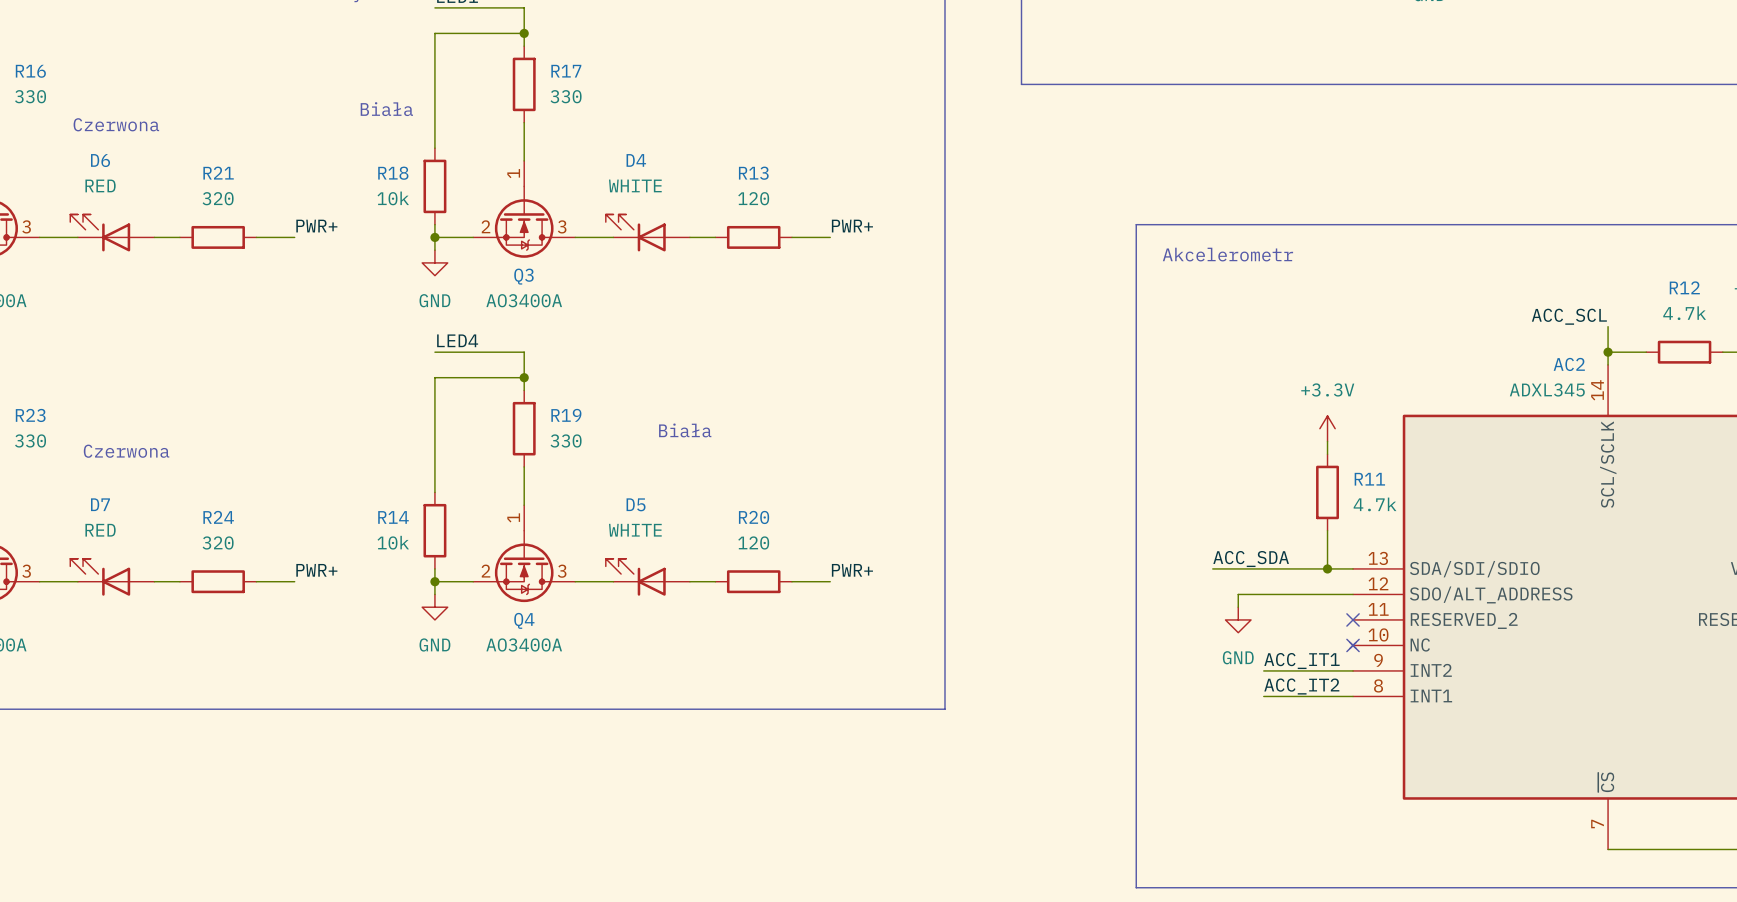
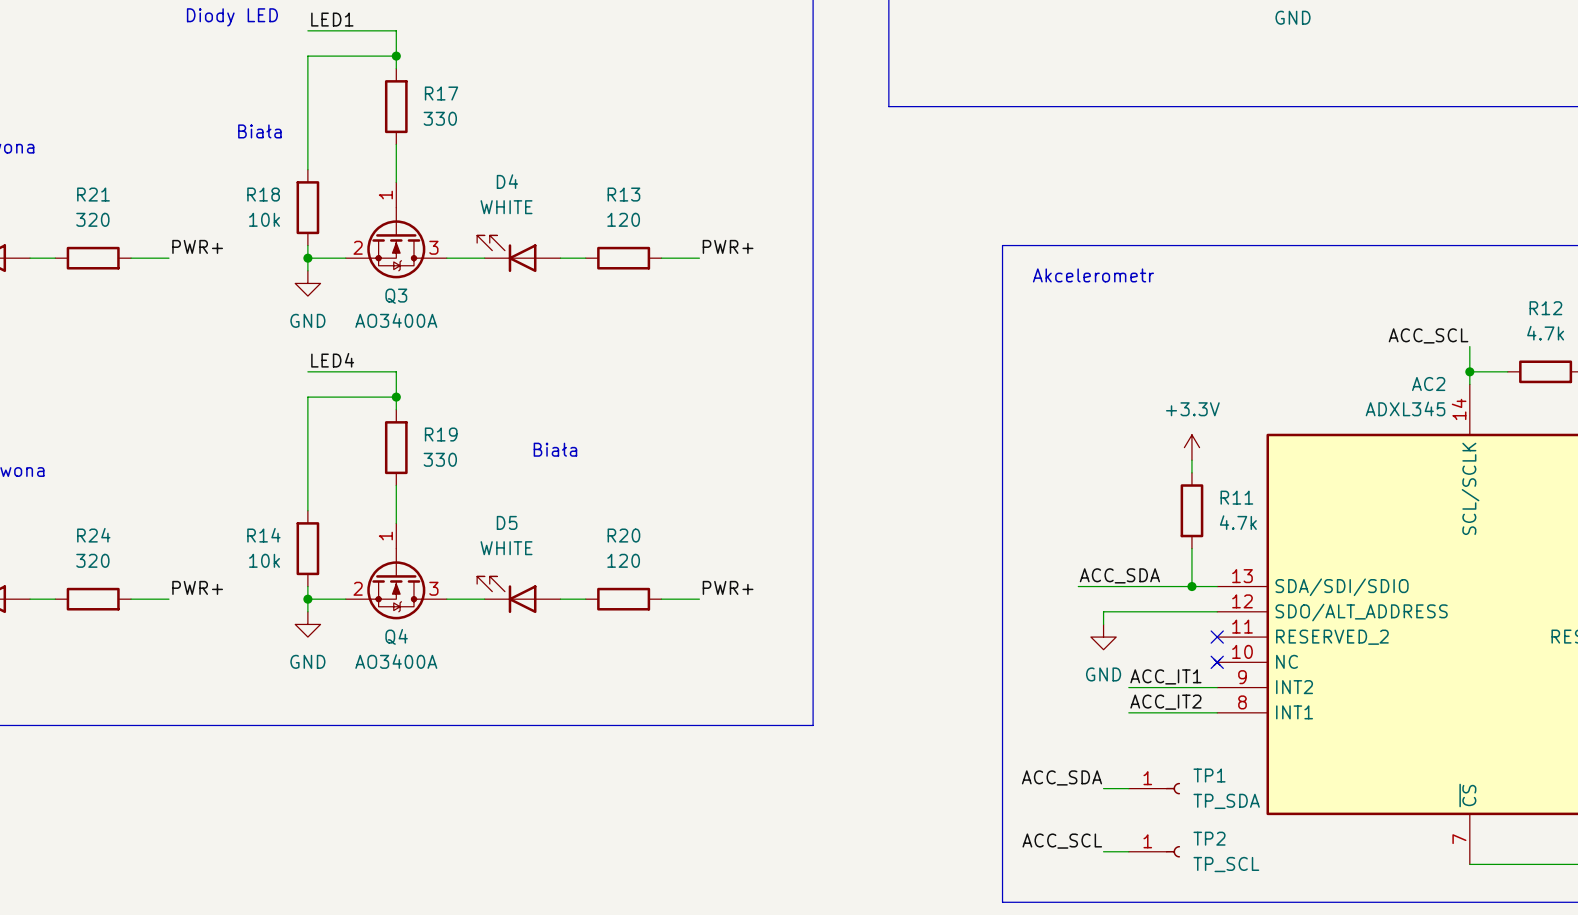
label: none -> ACC_SDA (1061, 777)
wire: none -> (1103, 788) (1128, 788)
TP1: none -> TP_SDA (1154, 788)
label: none -> ACC_SCL (1062, 841)
wire: none -> (1103, 851) (1128, 851)
TP2: none -> TP_SCL (1154, 851)

